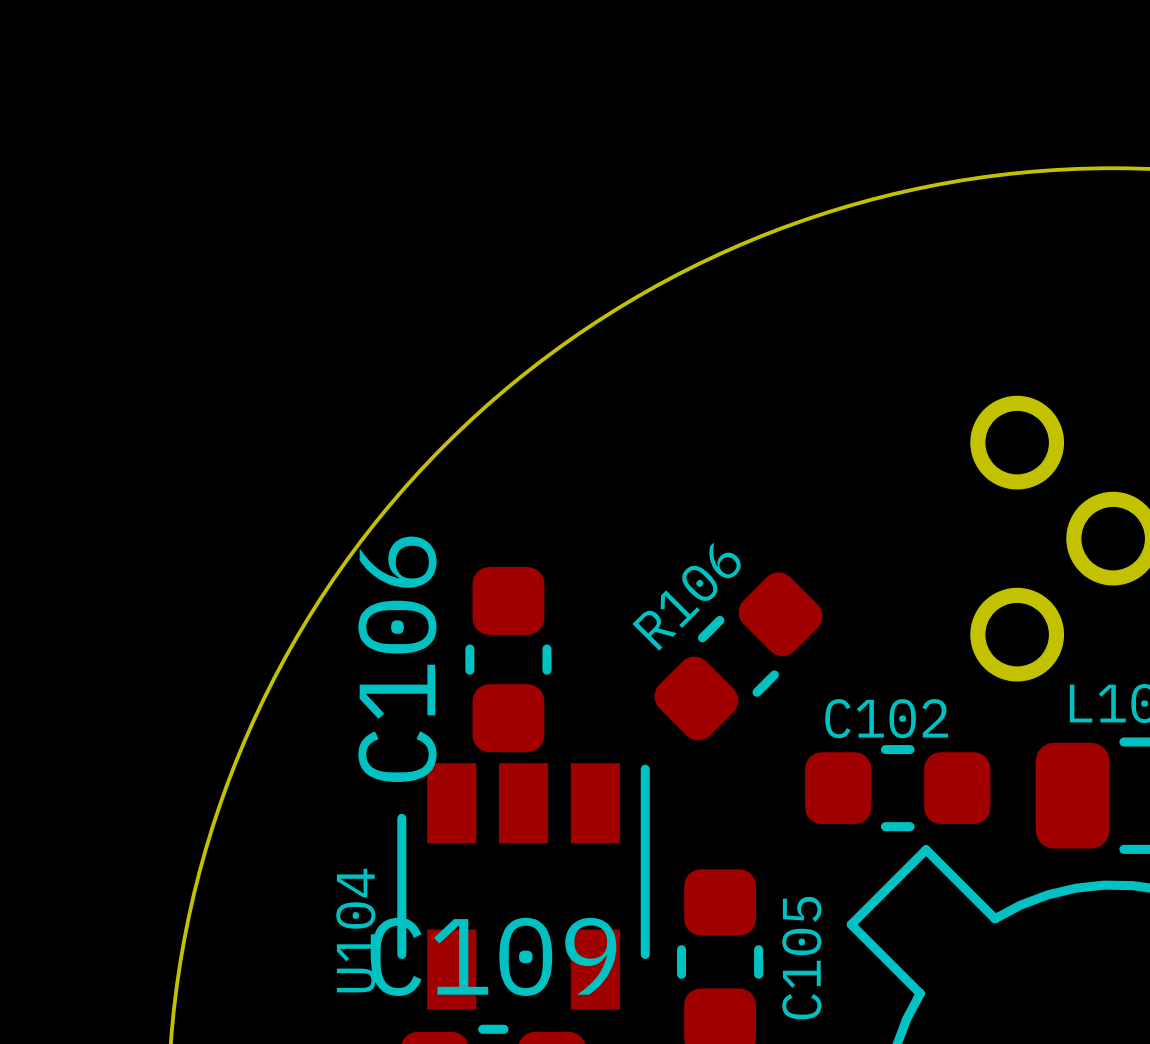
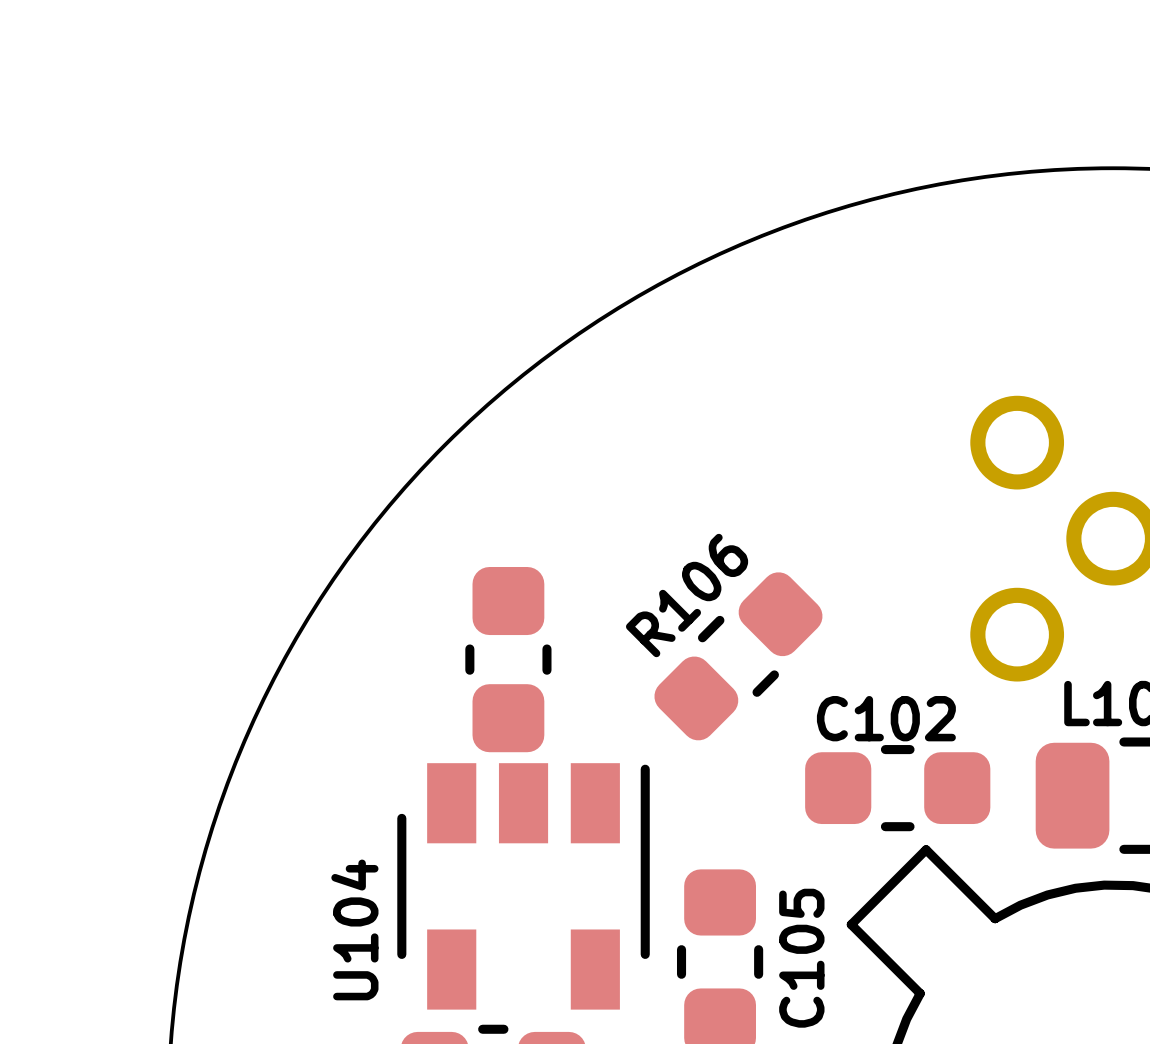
C106 name: C106 (397, 659) -> none
C109 name: C109 (493, 956) -> none

